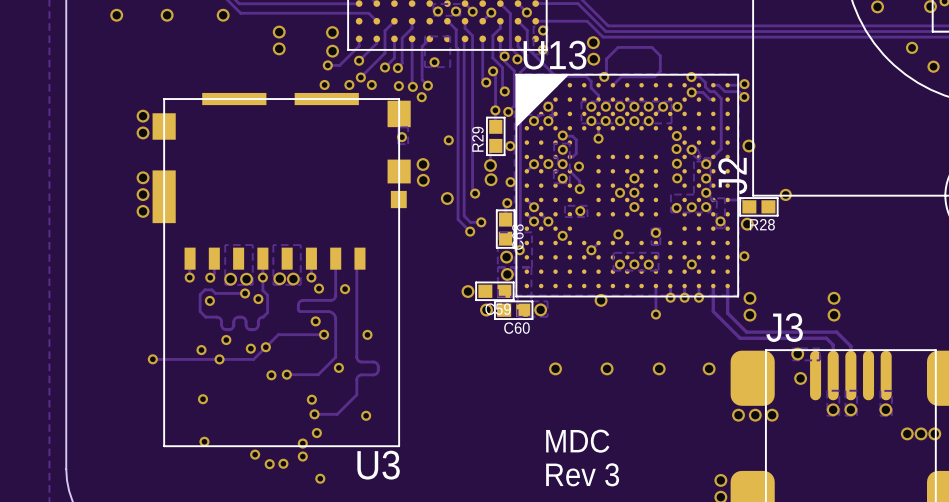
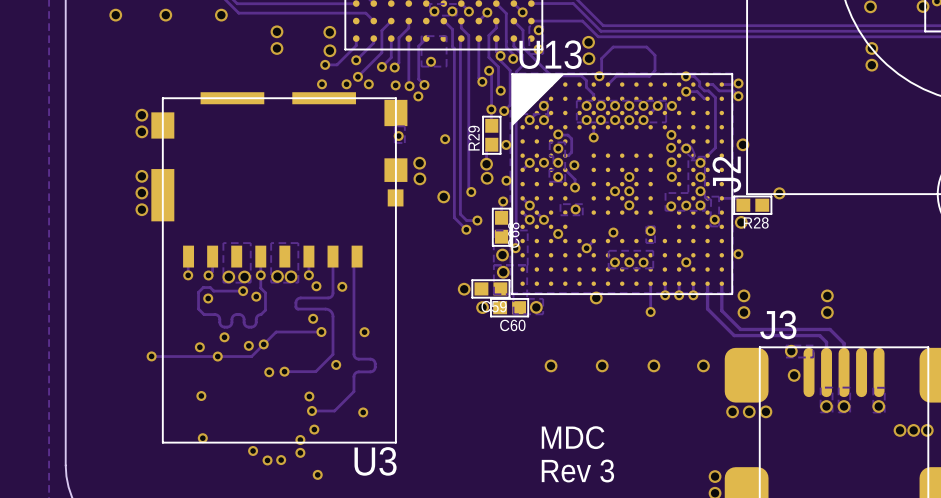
via: (912, 47) -> none
via: none -> (871, 48)
via: none -> (871, 65)
via: (933, 66) -> none

